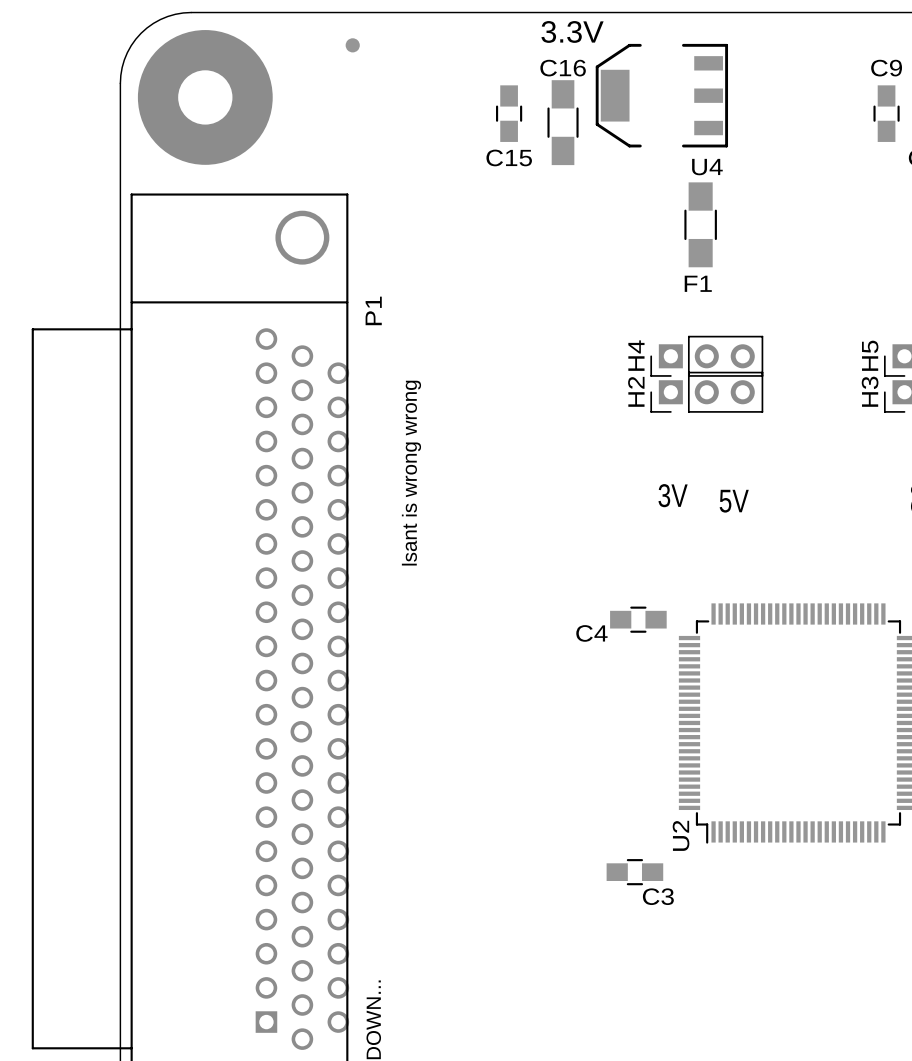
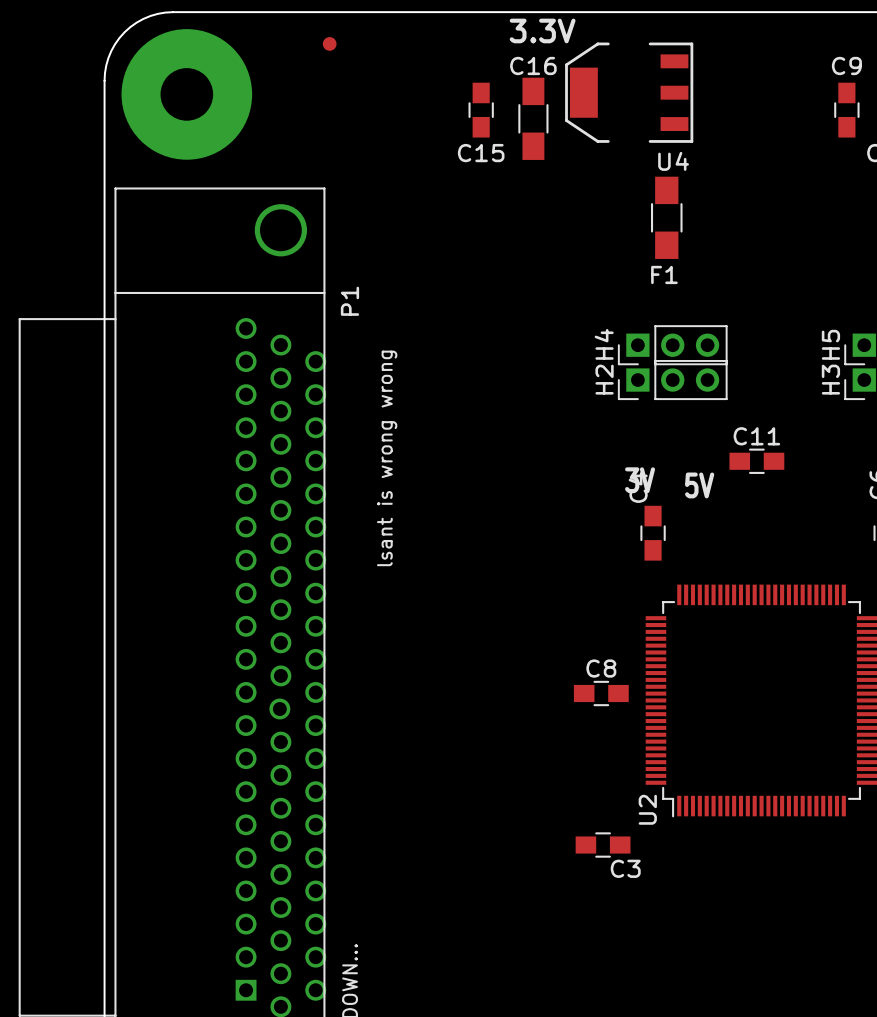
C11: none -> (756, 461)
C4 rotation: 0° (638, 619) -> 90° clockwise (653, 533)
C4 position: (638, 619) -> (653, 533)
C8: none -> (601, 693)

